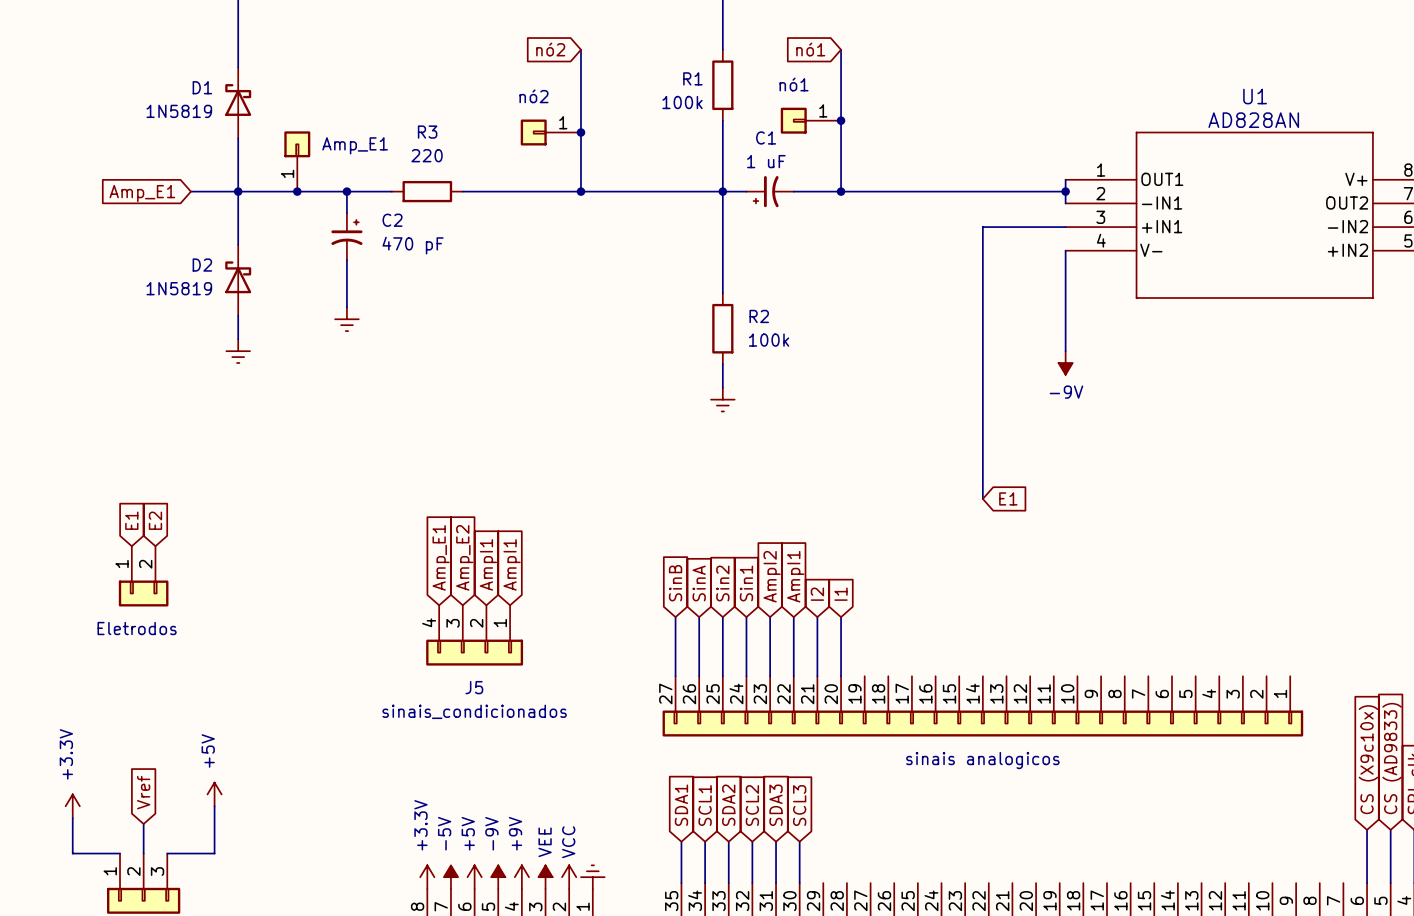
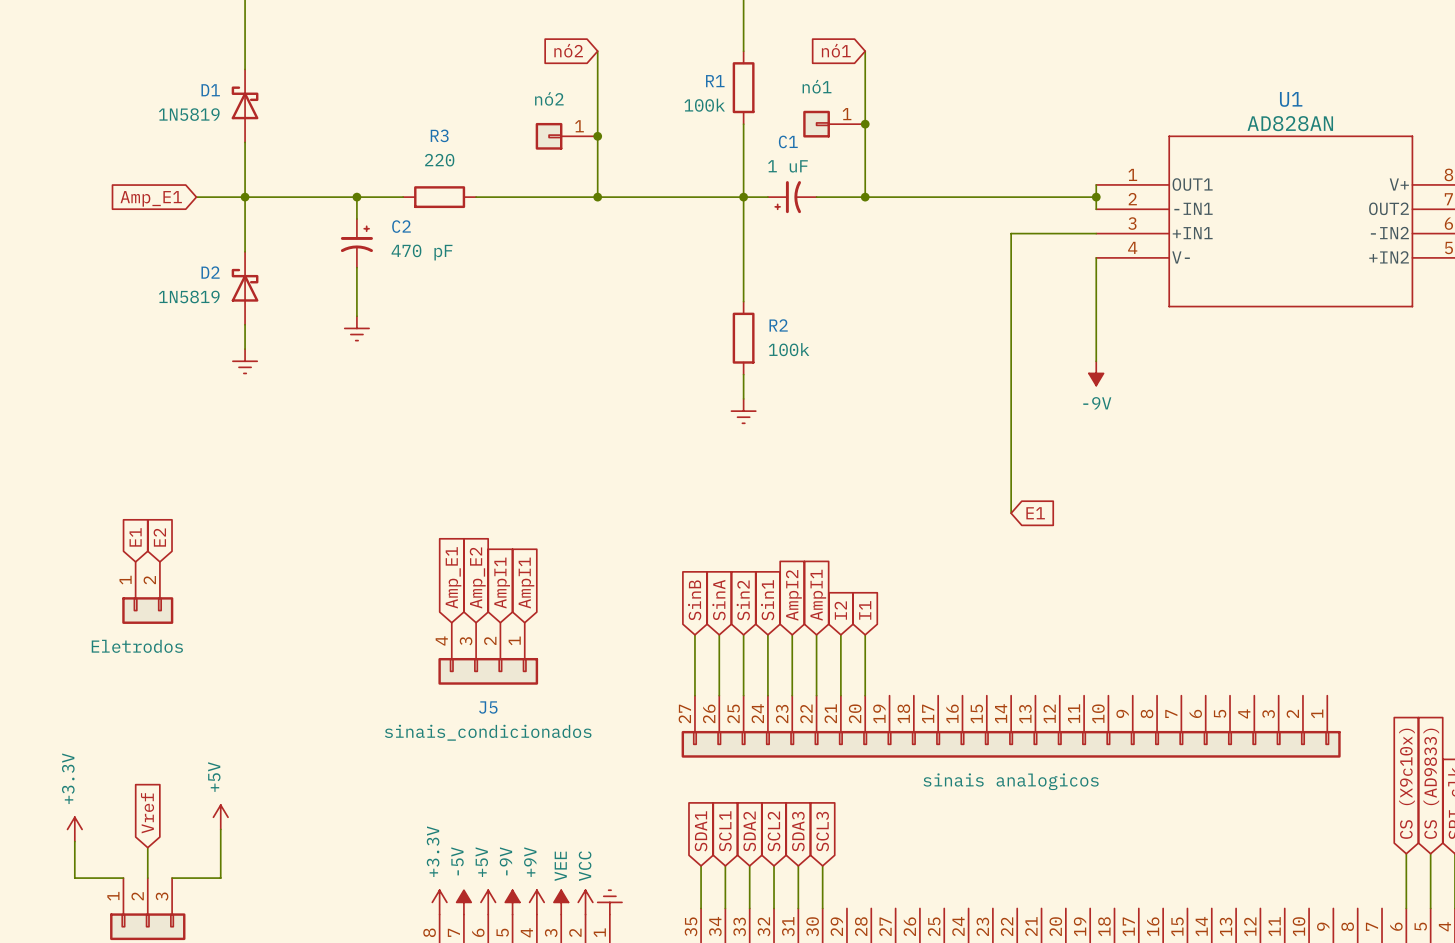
part: Amp_E1 (297, 161) -> none
junction: (297, 191) -> none

